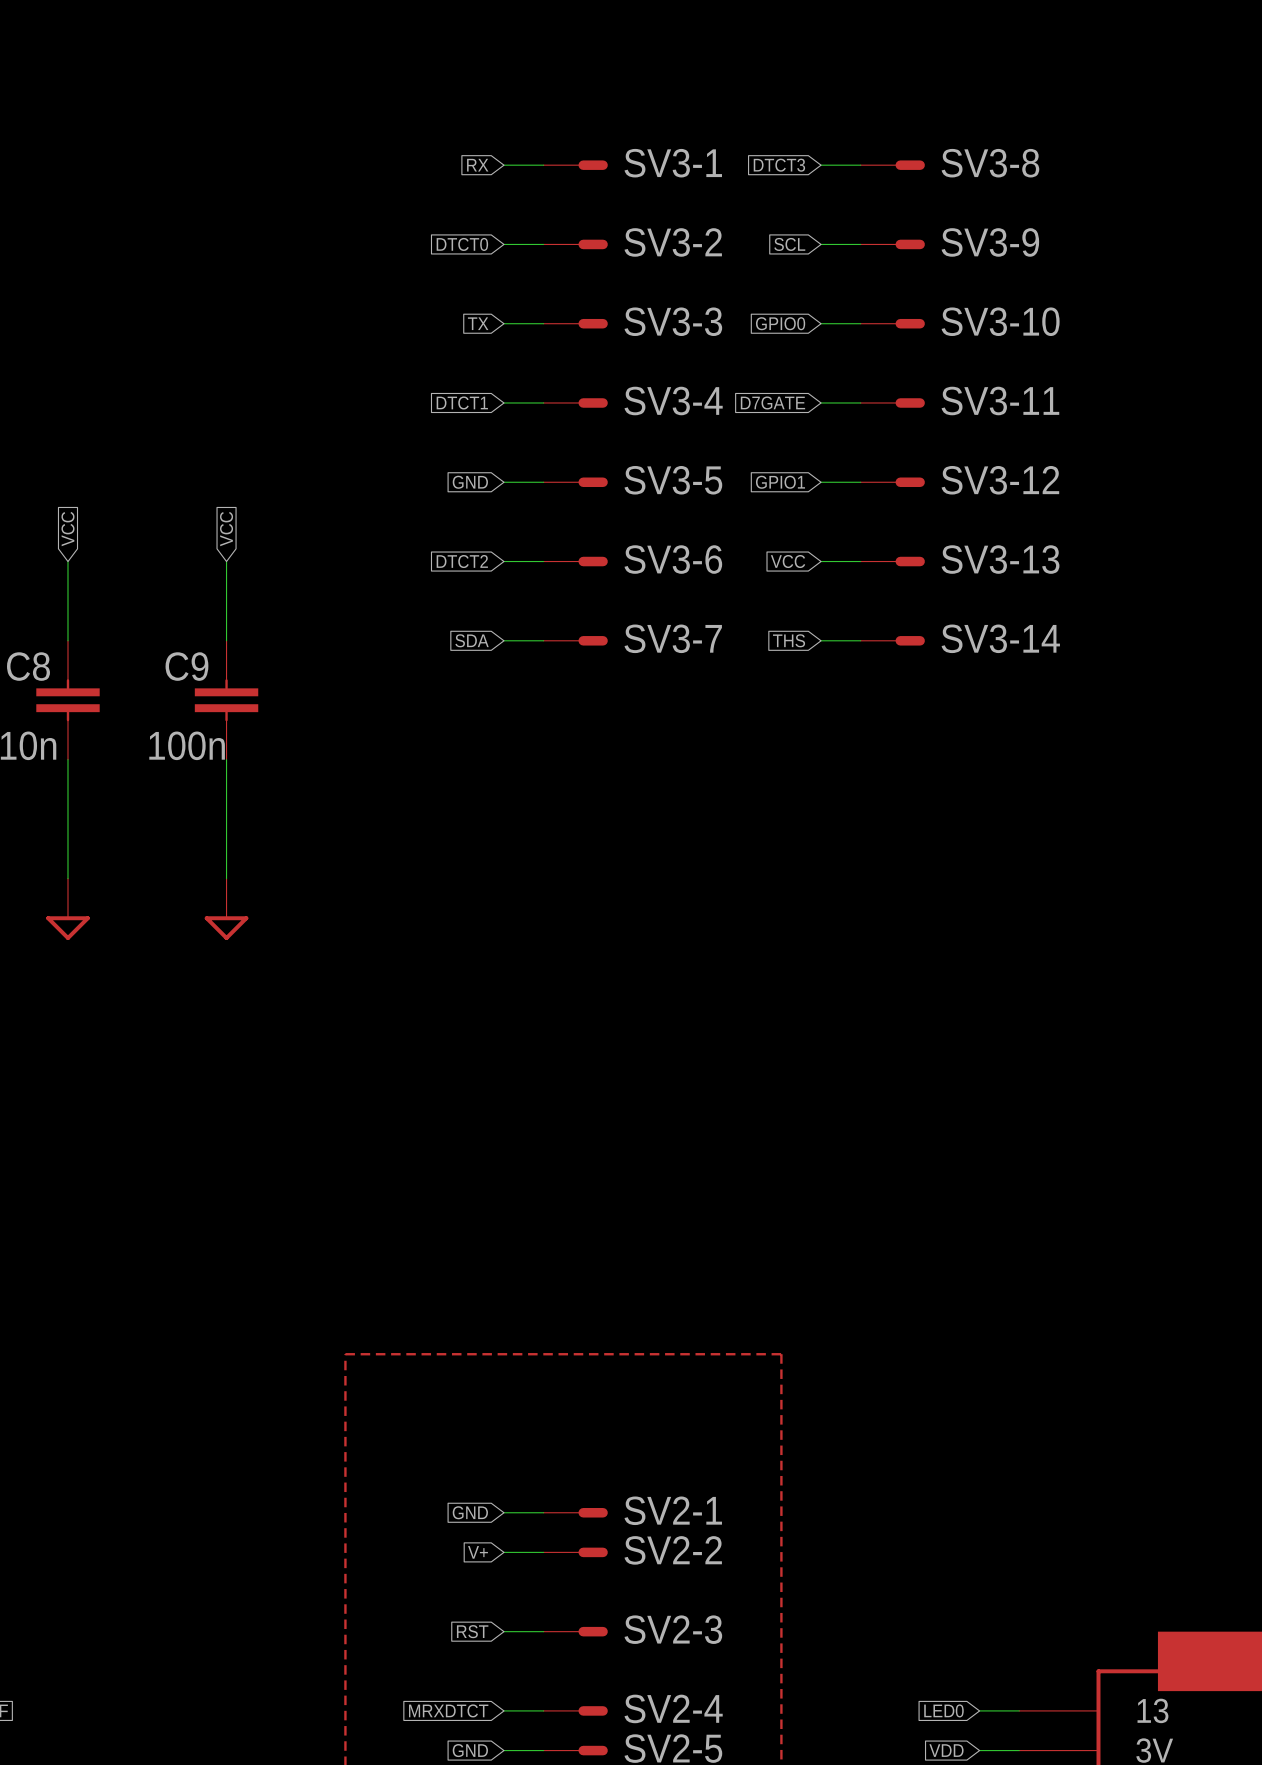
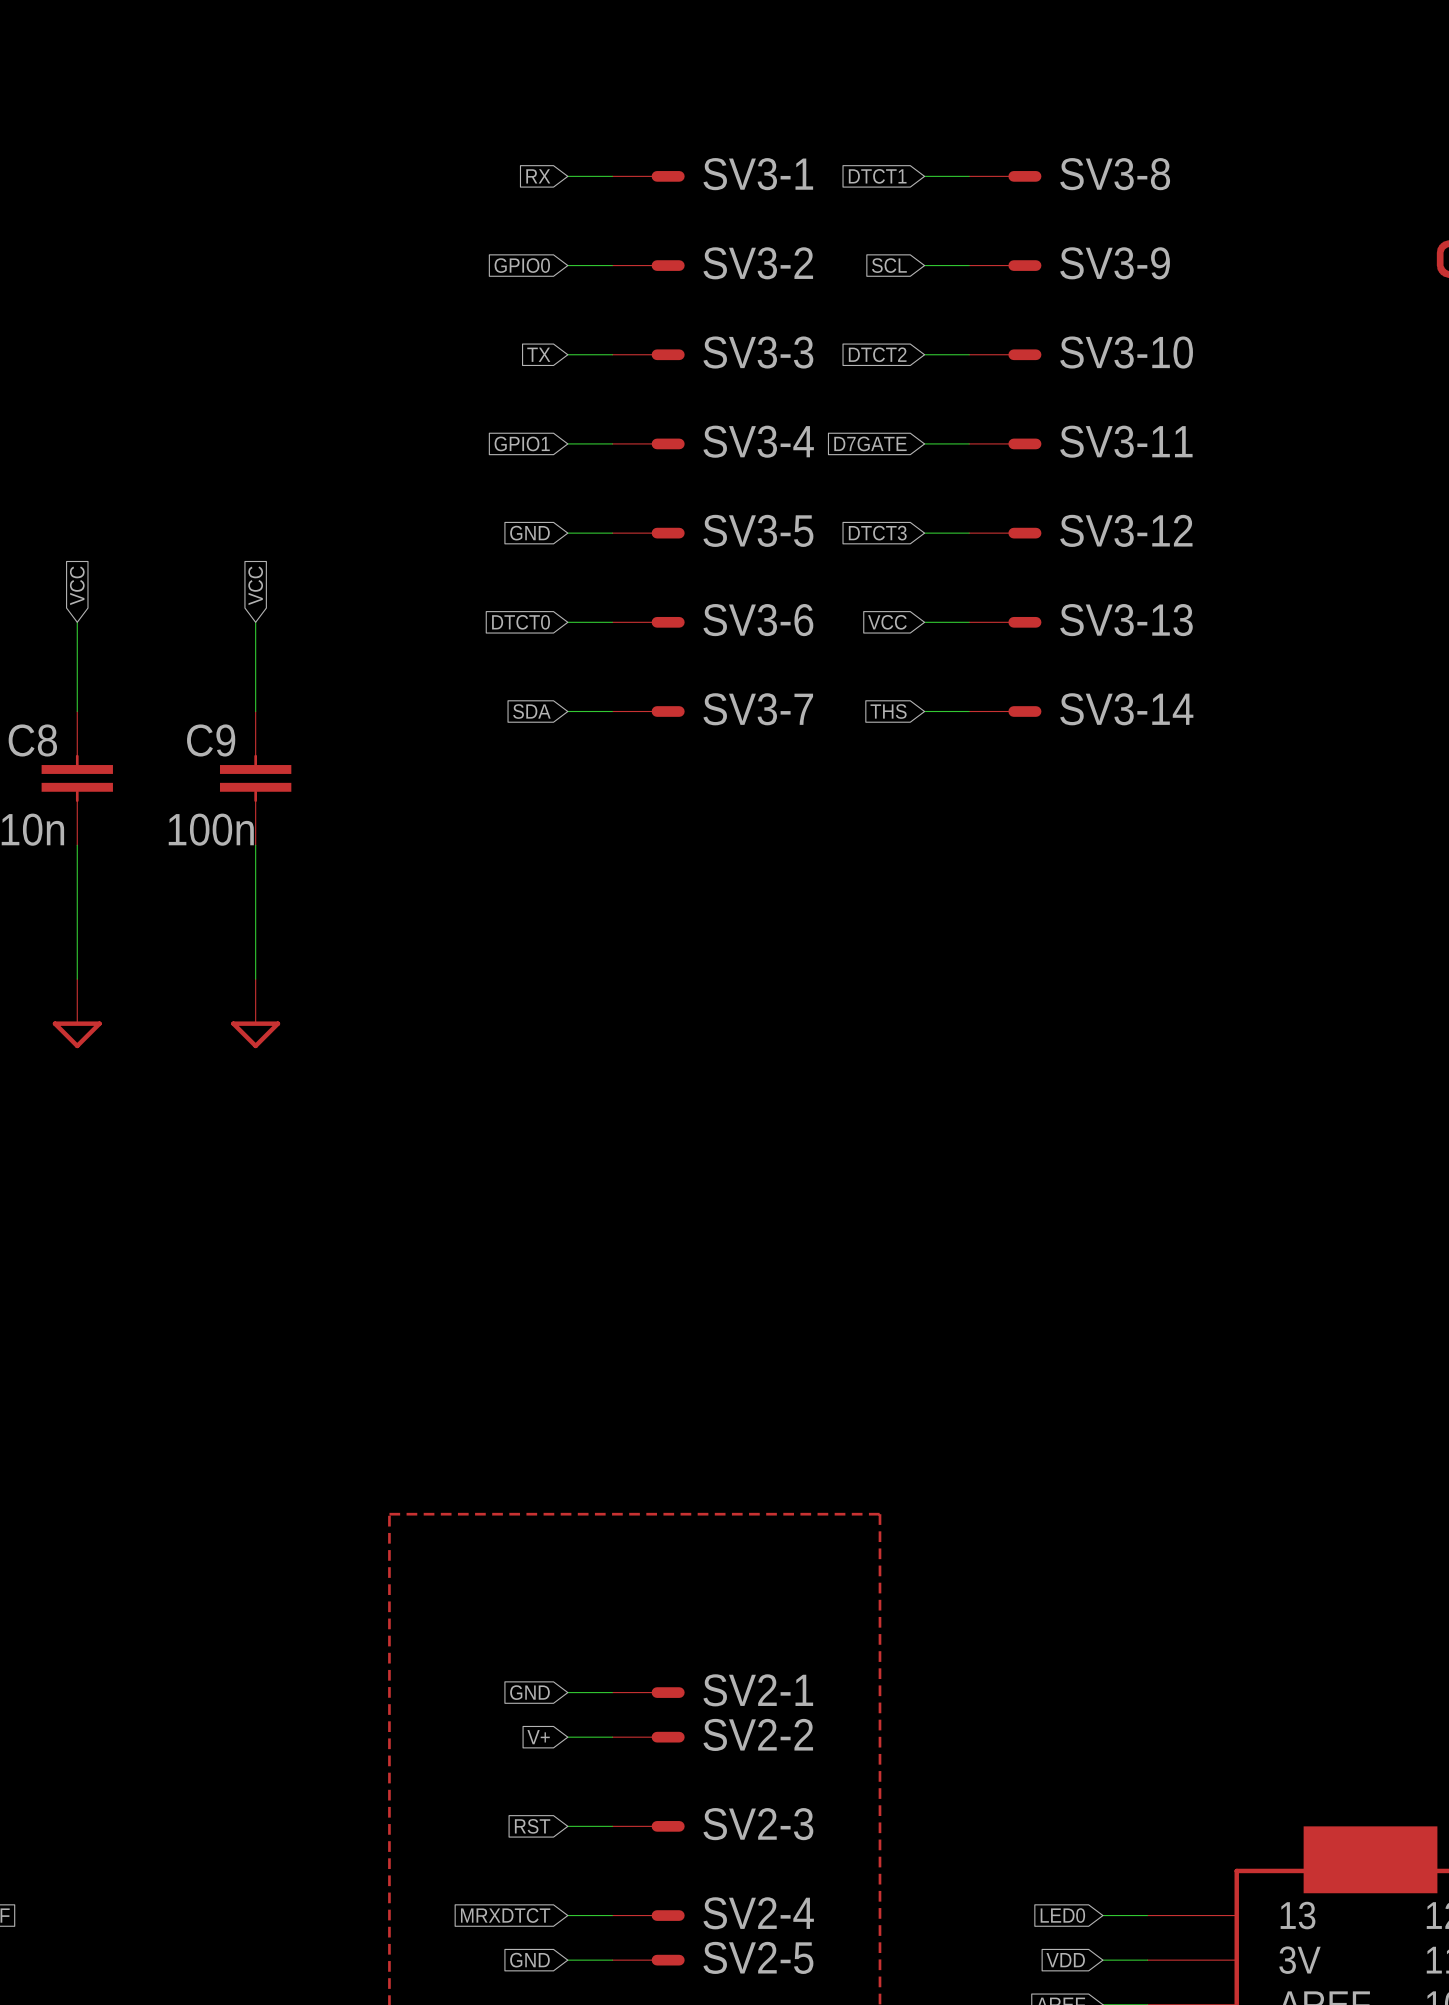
global label: DTCT3 (779, 165) -> DTCT1 (877, 176)
global label: DTCT0 (462, 244) -> GPIO0 (522, 265)
global label: GPIO0 (780, 323) -> DTCT2 (877, 354)
global label: DTCT1 (462, 402) -> GPIO1 (522, 443)
global label: GPIO1 (780, 482) -> DTCT3 (877, 533)
global label: DTCT2 (462, 561) -> DTCT0 (521, 622)

